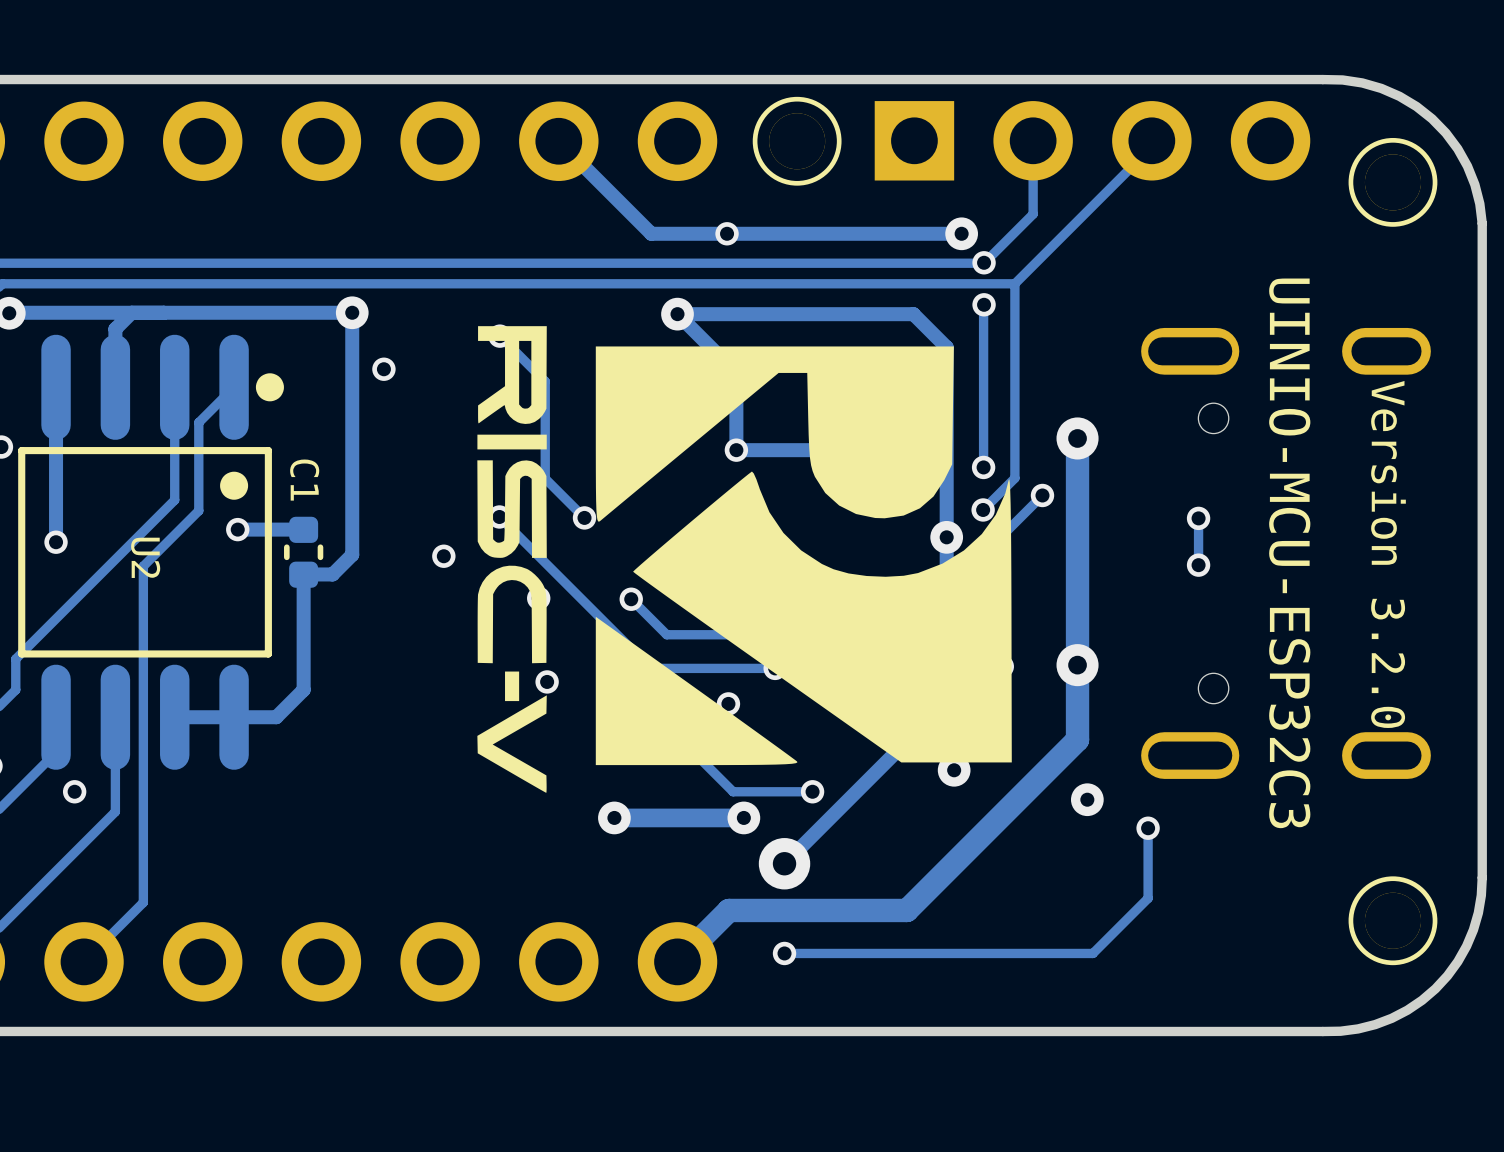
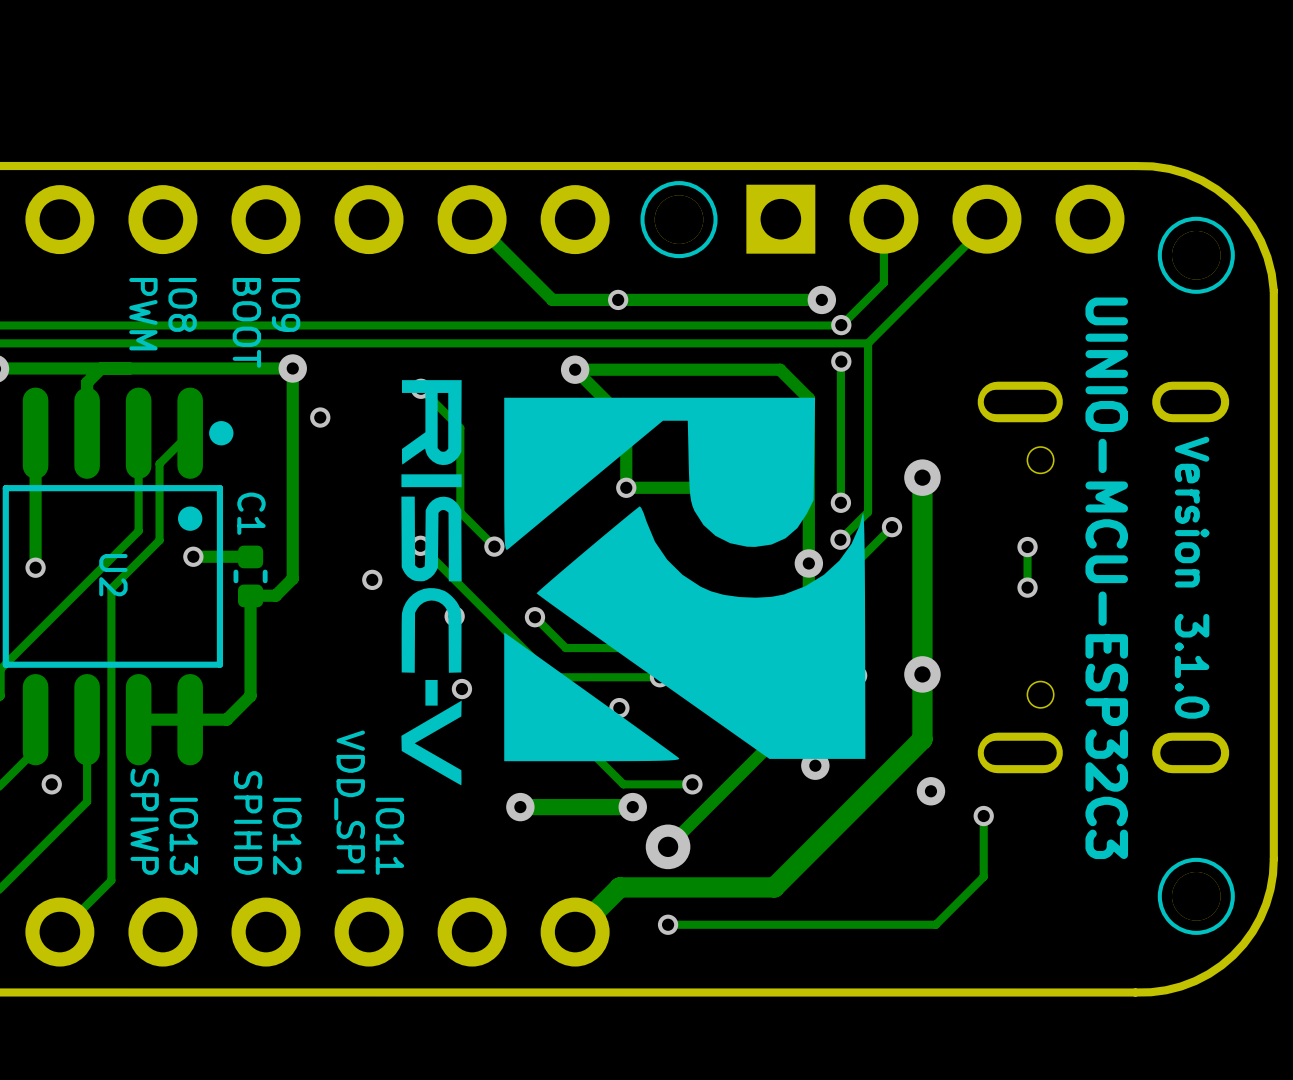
text: none -> PWM (143, 314)
text: none -> IO8 (182, 304)
text: none -> IO9 (286, 304)
text: none -> BOOT (246, 322)
text: Version 3.2.0 (1388, 554) -> Version 3.1.0 (1192, 577)
text: none -> VDD_SPI (349, 802)
text: none -> SPIWP (144, 821)
text: none -> SPIHD (248, 822)
text: none -> IO13 (183, 836)
text: none -> IO12 (287, 836)
text: none -> IO11 (389, 836)

